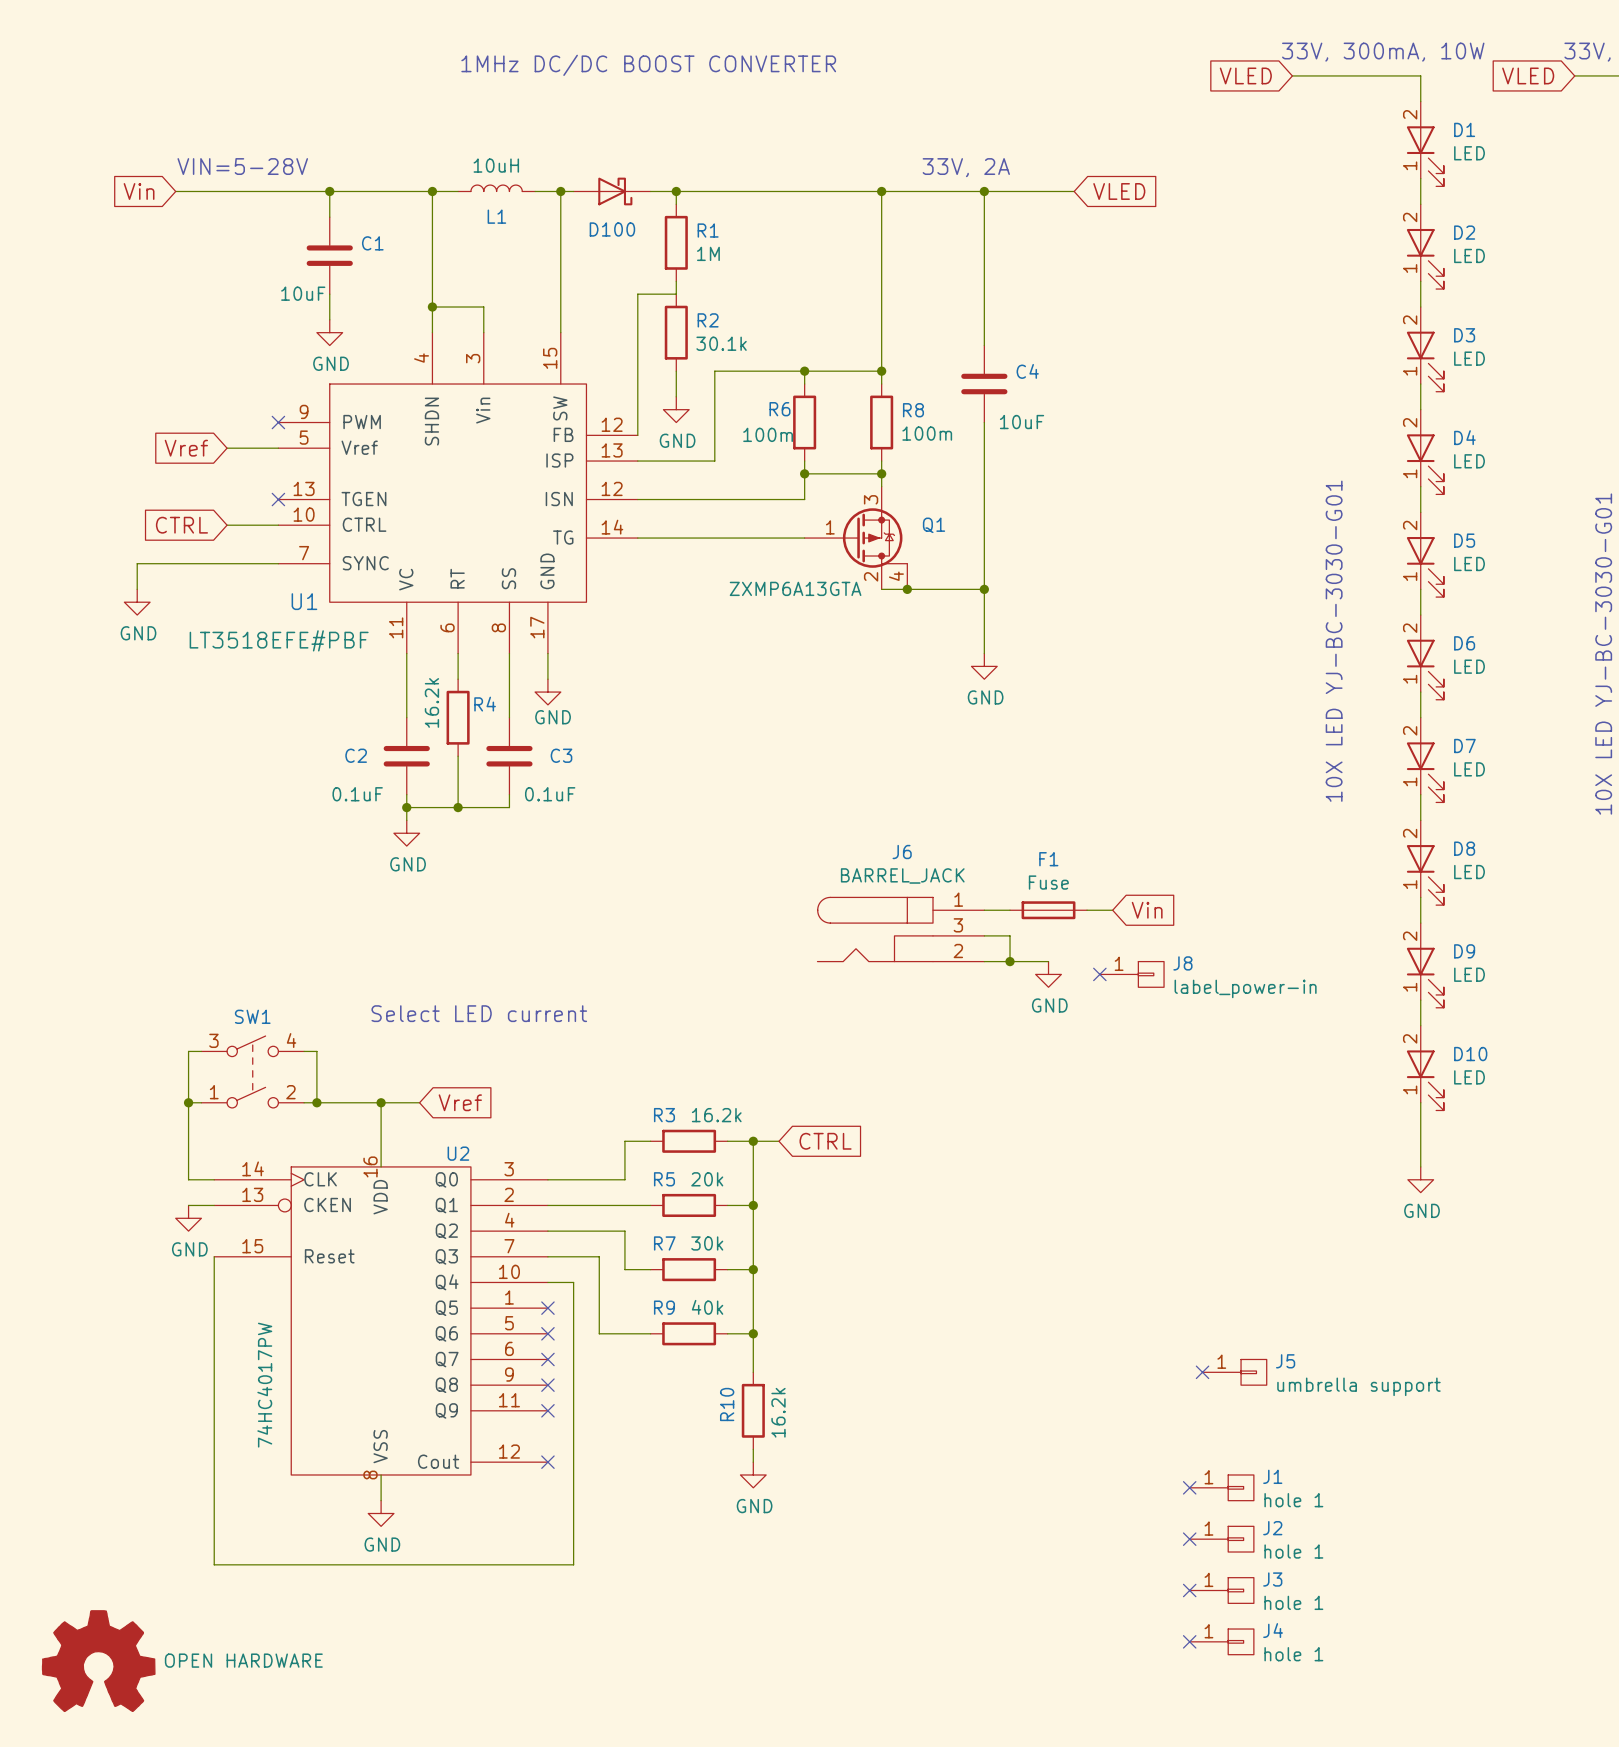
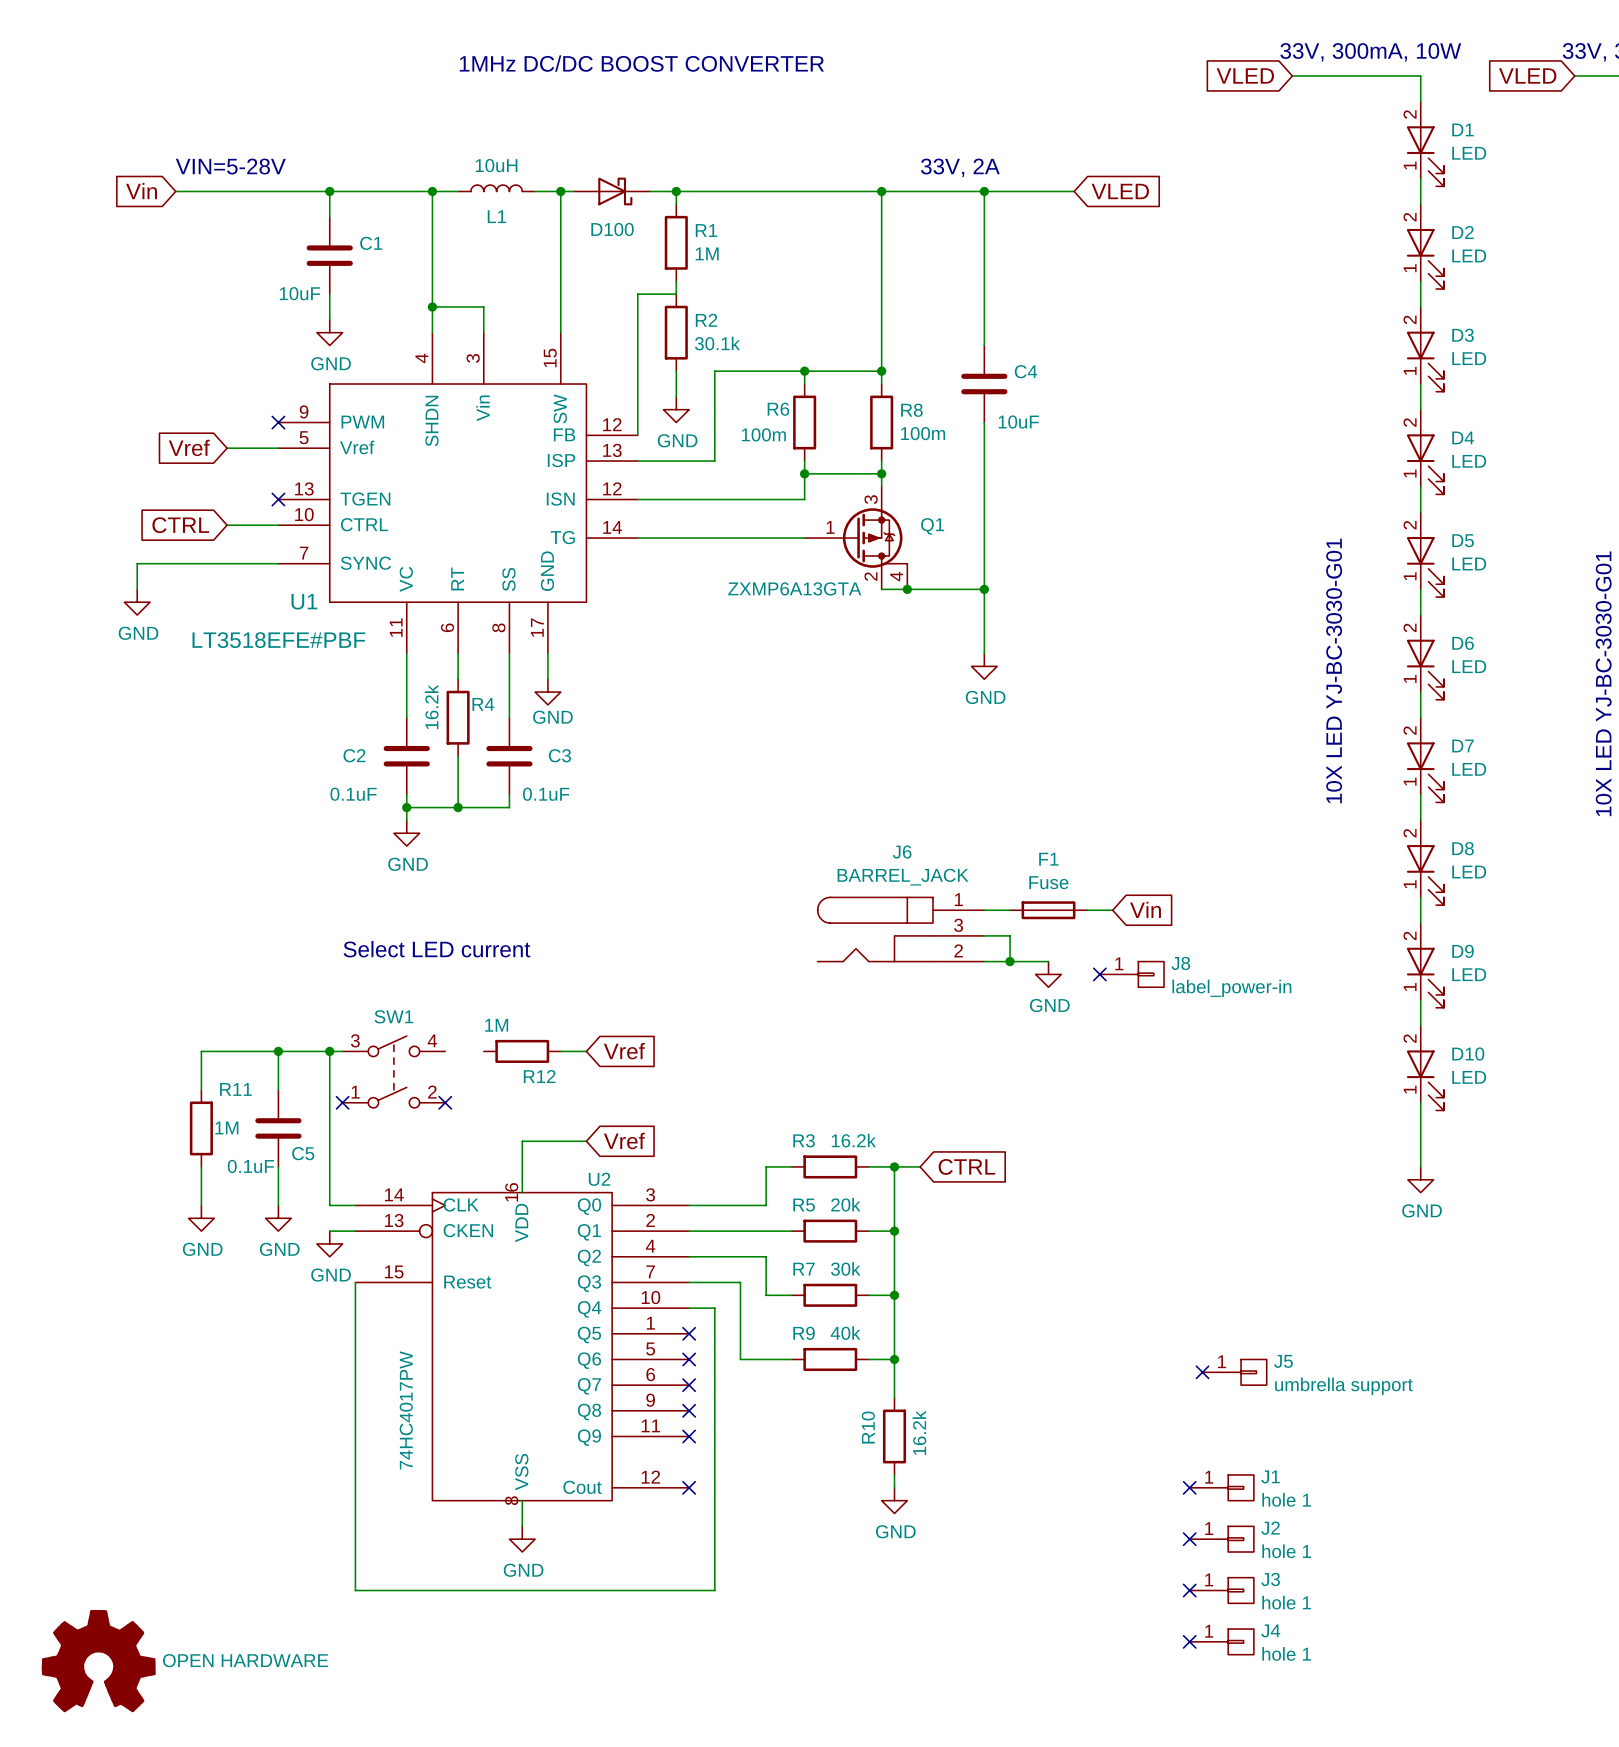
text position: Select LED current (479, 1013) -> Select LED current (436, 949)
wire: (201, 1051) (188, 1051) (188, 1179) (214, 1179) -> none
wire: none -> (278, 1051) (278, 1089)
junction: none -> (278, 1051)
wire: none -> (304, 1051) (201, 1051) (201, 1089)
wire: (316, 1051) (316, 1102) -> (316, 1051) (342, 1051)
wire: none -> (329, 1051) (329, 1205) (355, 1205)
junction: none -> (329, 1051)
R12: none -> 1M (522, 1051)
wire: none -> (560, 1051) (586, 1051)
global label: none -> Vref (624, 1051)
SW1 position: (252, 1071) -> (393, 1071)
junction: (188, 1102) -> none
wire: (304, 1102) (419, 1102) -> none
junction: (316, 1102) -> none
no-connect mark: none -> (342, 1102)
wire: (381, 1102) (381, 1166) -> none
junction: (381, 1102) -> none
no-connect mark: none -> (445, 1102)
global label: Vref (460, 1102) -> none
R11: none -> 1M (201, 1128)
C5: none -> 0.1uF (278, 1128)
wire: none -> (586, 1141) (522, 1141) (522, 1192)
global label: none -> Vref (624, 1140)
wire: (650, 1141) (624, 1141) (624, 1179) (547, 1179) -> none
R3 position: (689, 1141) -> (830, 1166)
wire: (727, 1141) (778, 1141) -> (868, 1166) (920, 1166)
wire: (753, 1141) (753, 1372) -> (894, 1166) (894, 1397)
junction: (753, 1141) -> none
global label position: CTRL (825, 1141) -> CTRL (966, 1166)
wire: none -> (201, 1166) (201, 1205)
wire: none -> (278, 1166) (278, 1205)
wire: none -> (791, 1166) (766, 1166) (766, 1205) (753, 1205)
junction: none -> (894, 1166)
wire: (188, 1205) (214, 1205) -> (329, 1231) (355, 1231)
wire: (547, 1205) (650, 1205) -> (689, 1231) (791, 1231)
wire: none -> (689, 1205) (727, 1205)
R5 position: (689, 1205) -> (830, 1231)
junction: (753, 1205) -> none
power symbol position: GND (188, 1218) -> GND (201, 1218)
power symbol: none -> GND (278, 1218)
wire: (547, 1231) (624, 1231) (624, 1269) (650, 1269) -> (689, 1256) (766, 1256) (766, 1295) (791, 1295)
wire: none -> (868, 1231) (894, 1231)
junction: none -> (894, 1231)
power symbol: none -> GND (329, 1243)
wire: (214, 1256) (214, 1564) (573, 1564) (573, 1282) (547, 1282) -> (355, 1282) (355, 1590) (714, 1590) (714, 1308) (689, 1308)
wire: (547, 1256) (599, 1256) (599, 1333) (650, 1333) -> (689, 1282) (740, 1282) (740, 1359) (791, 1359)
R7 position: (689, 1269) -> (830, 1295)
wire: (727, 1269) (753, 1269) -> (868, 1295) (894, 1295)
junction: (753, 1269) -> none
junction: none -> (894, 1295)
no-connect mark: (547, 1308) -> none
U2 position: (381, 1320) -> (522, 1346)
no-connect mark: (547, 1333) -> none
R9 position: (689, 1333) -> (830, 1359)
no-connect mark: none -> (689, 1333)
wire: (727, 1333) (753, 1333) -> (868, 1359) (894, 1359)
junction: (753, 1333) -> none
no-connect mark: (547, 1359) -> none
no-connect mark: none -> (689, 1359)
junction: none -> (894, 1359)
no-connect mark: (547, 1385) -> none
no-connect mark: none -> (689, 1385)
no-connect mark: (547, 1410) -> none
no-connect mark: none -> (689, 1410)
R10 position: (753, 1410) -> (894, 1436)
no-connect mark: none -> (689, 1436)
wire: (753, 1449) (753, 1462) -> (894, 1474) (894, 1487)
no-connect mark: (547, 1462) -> none
wire: (381, 1474) (381, 1500) -> (522, 1500) (522, 1526)
power symbol: GND (753, 1474) -> none
no-connect mark: none -> (689, 1487)
power symbol: none -> GND (894, 1500)
power symbol: GND (381, 1513) -> none
power symbol: none -> GND (522, 1539)

